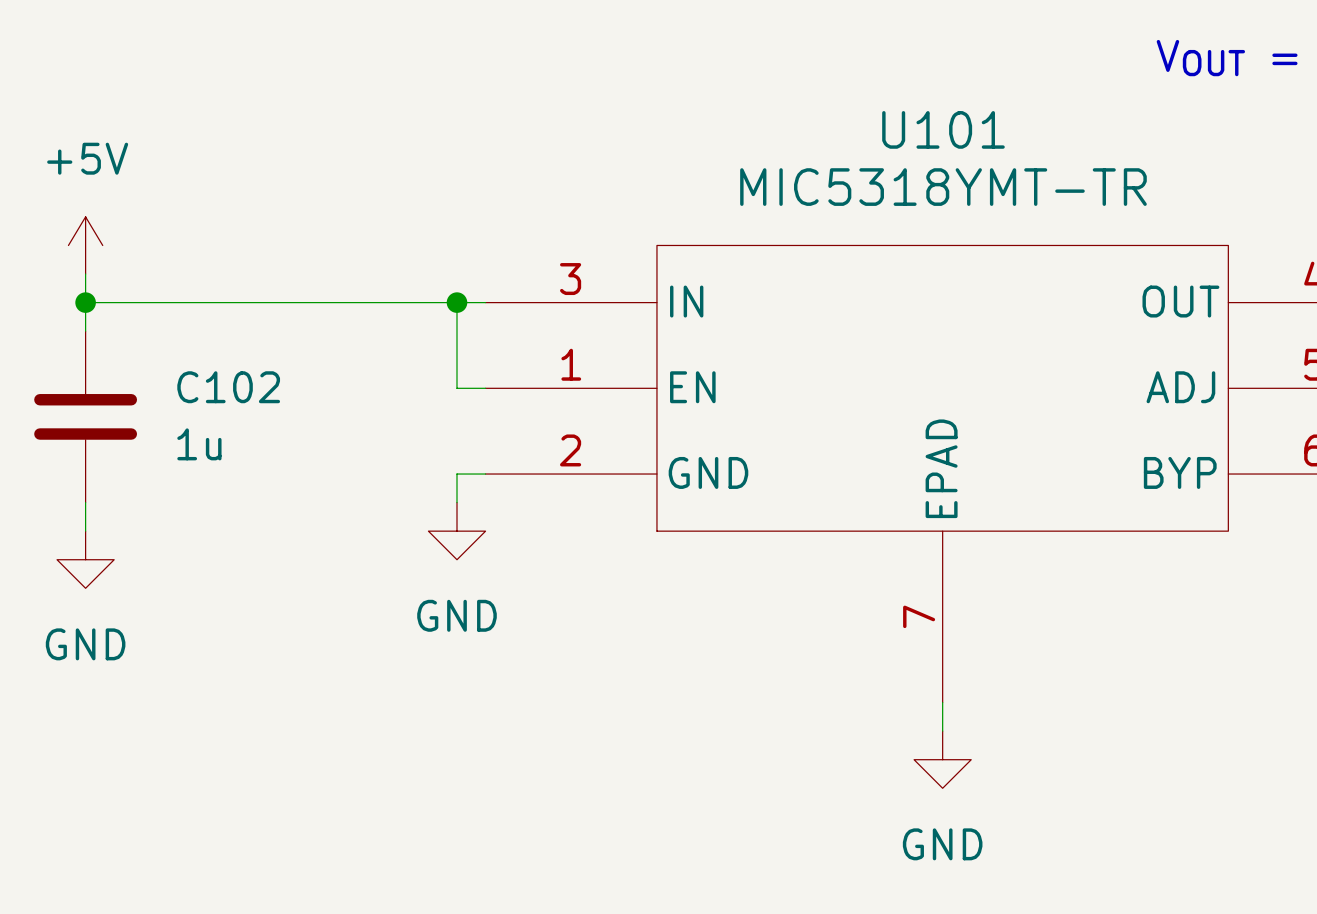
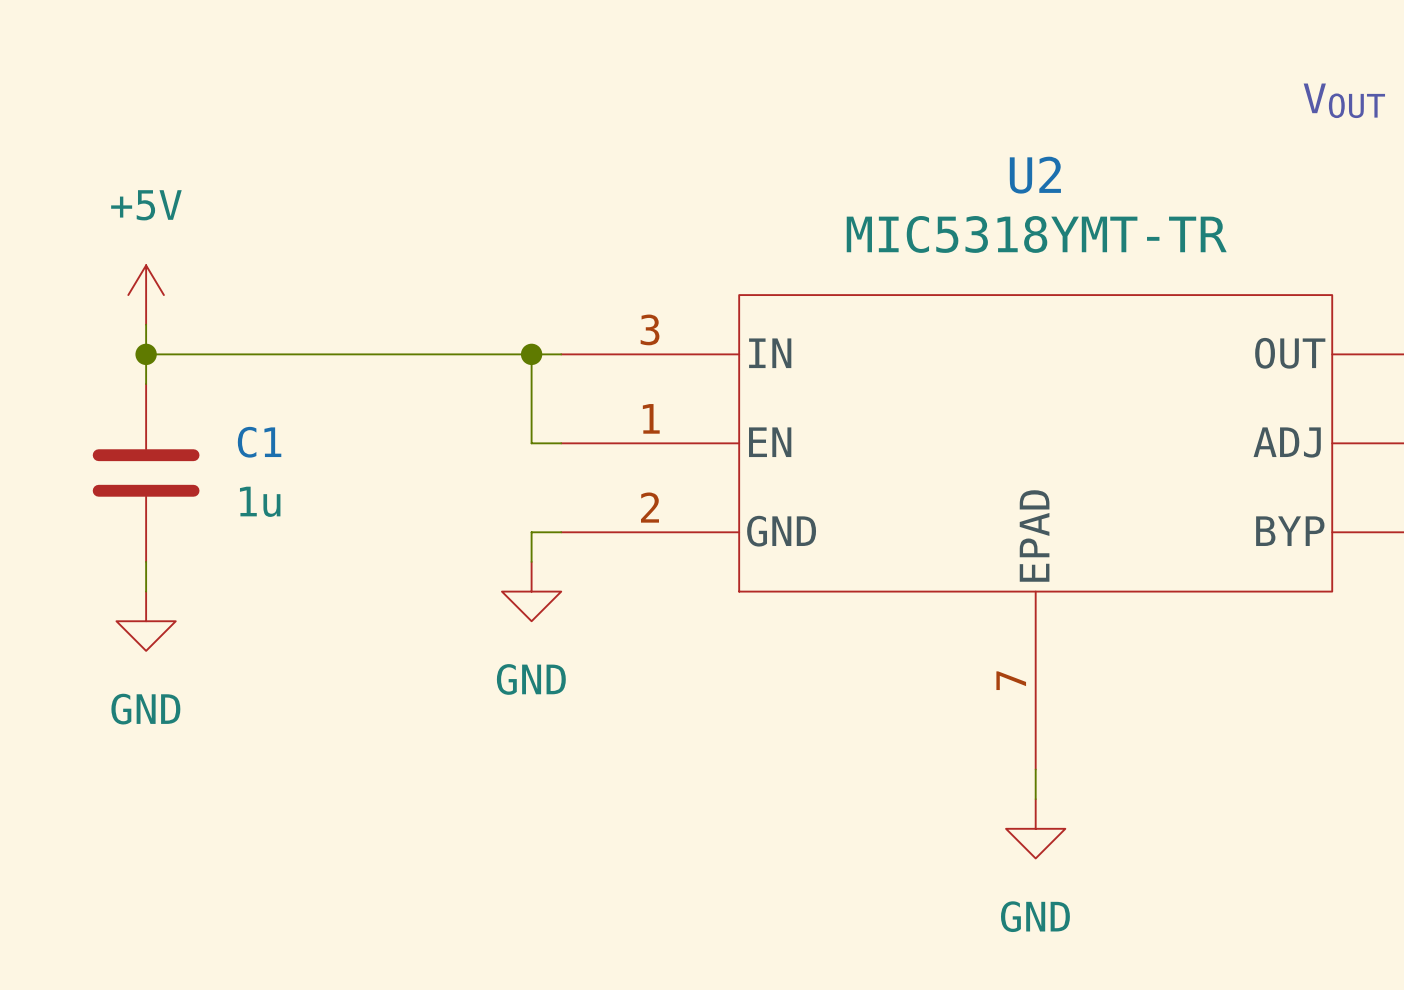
U101 name: U101 (943, 129) -> U2 (1035, 175)
C102 name: C102 (228, 387) -> C1 (259, 442)

